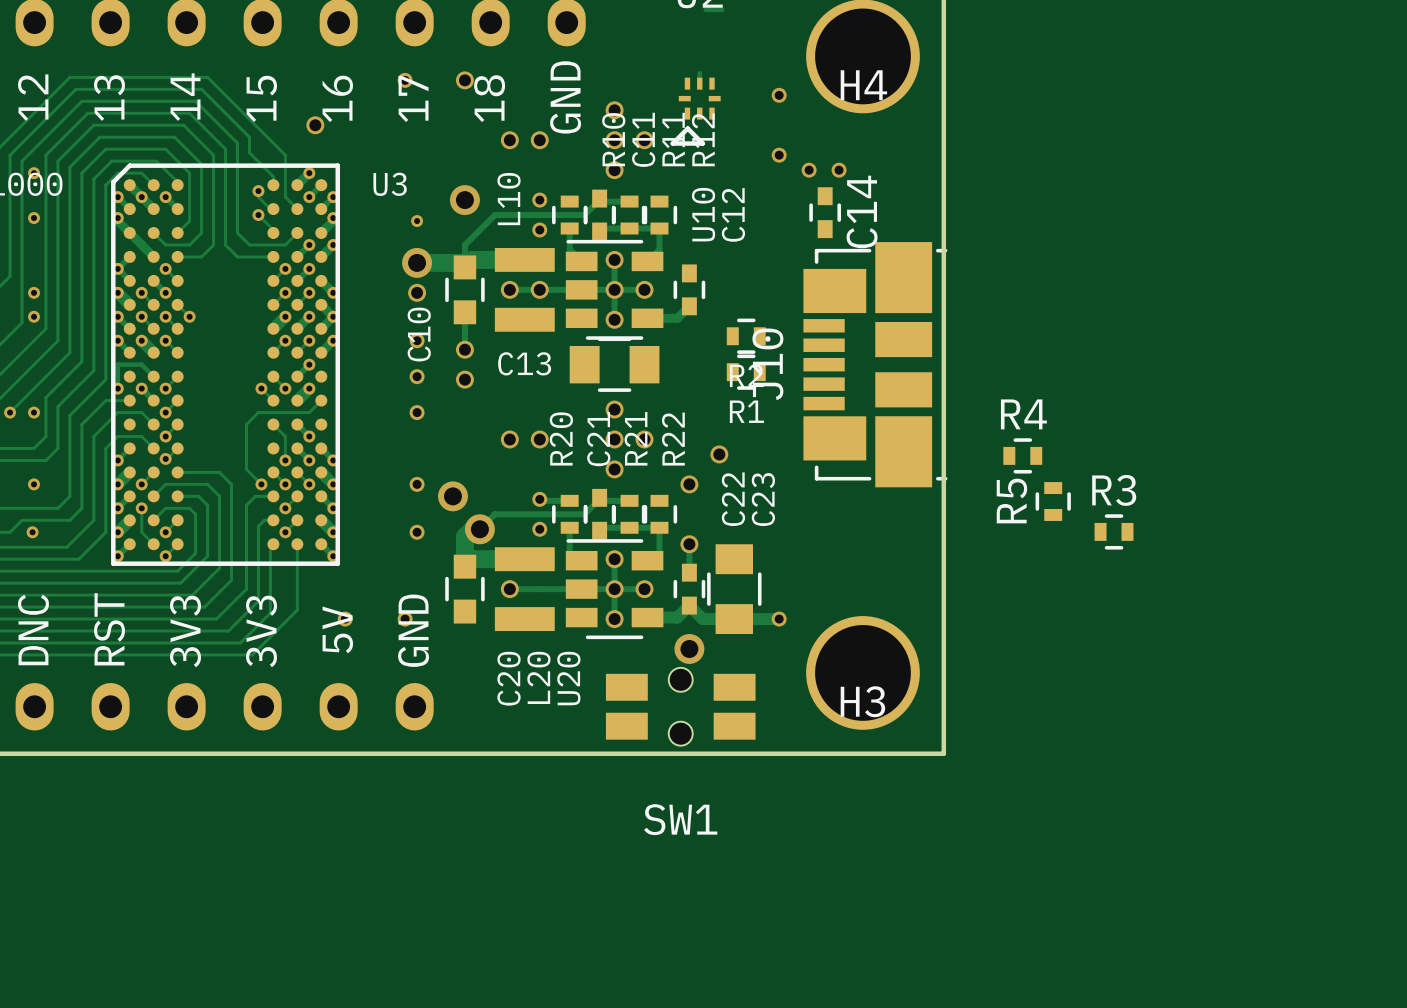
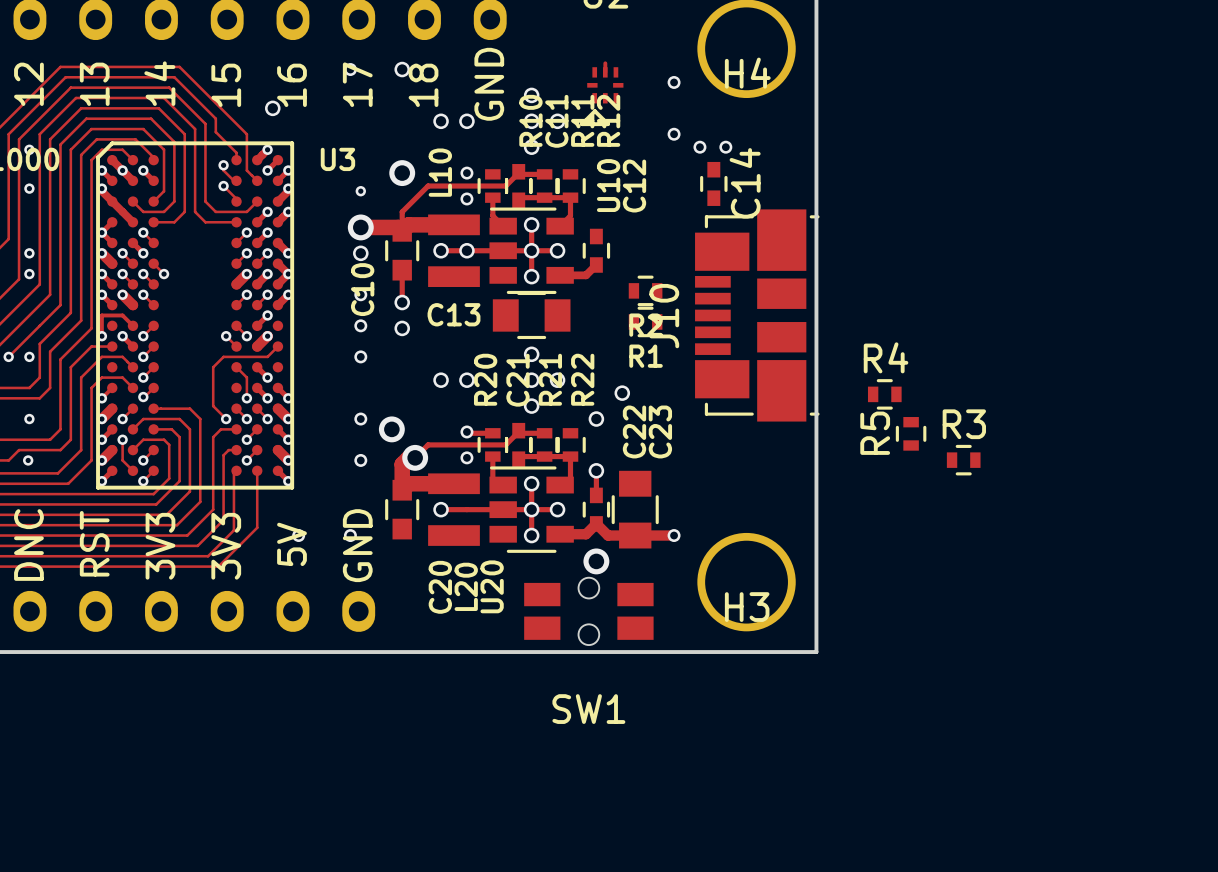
track: (705, 9) (722, 9) -> none

